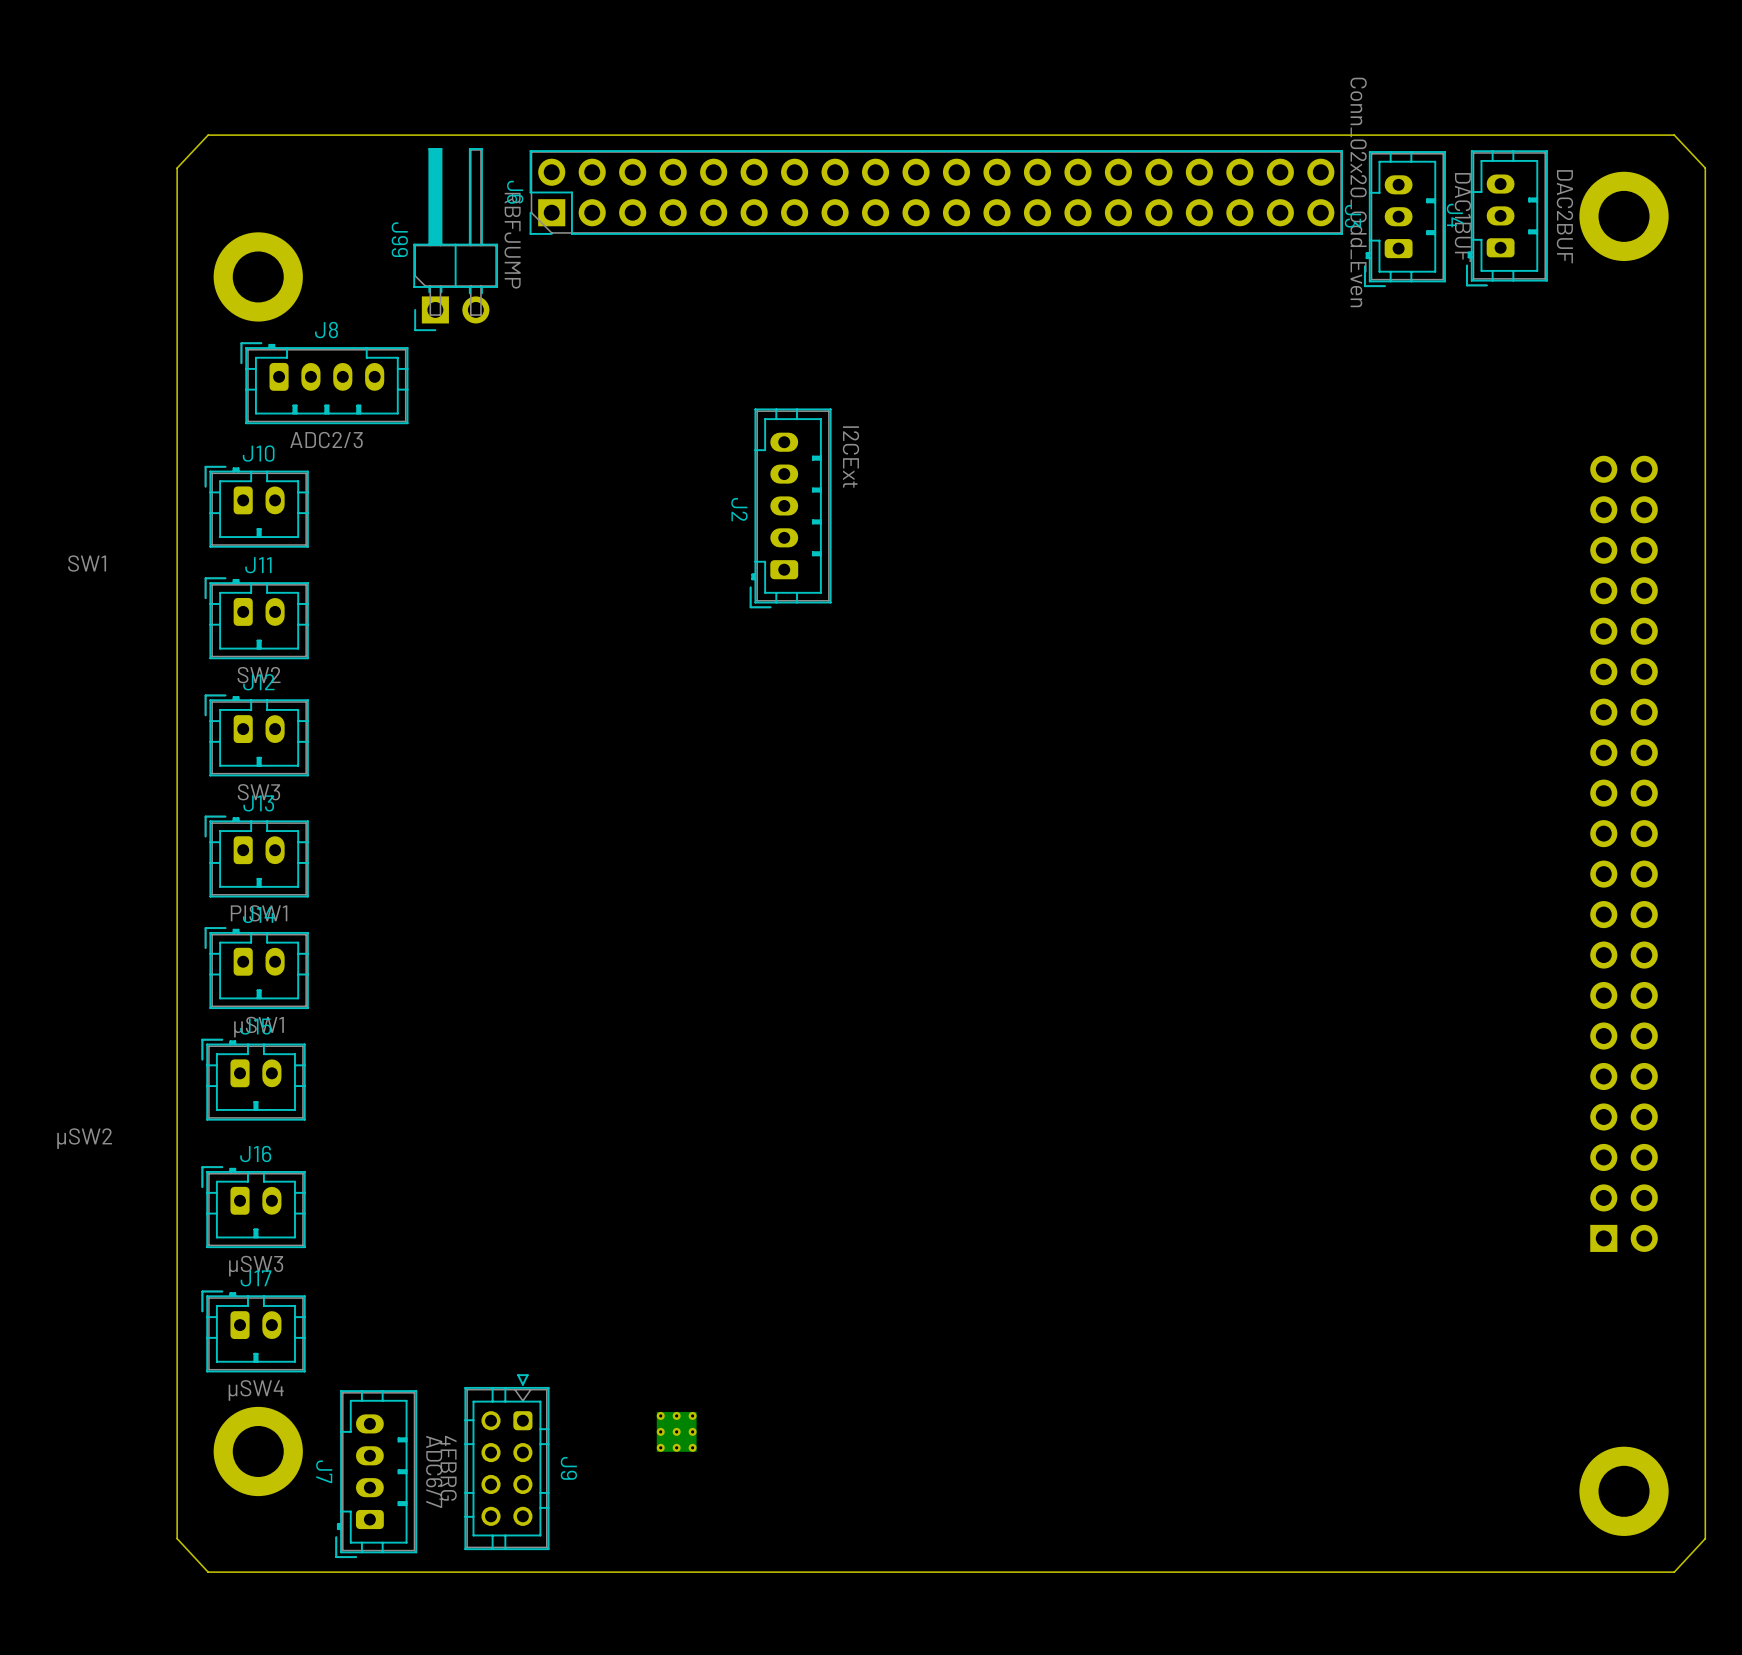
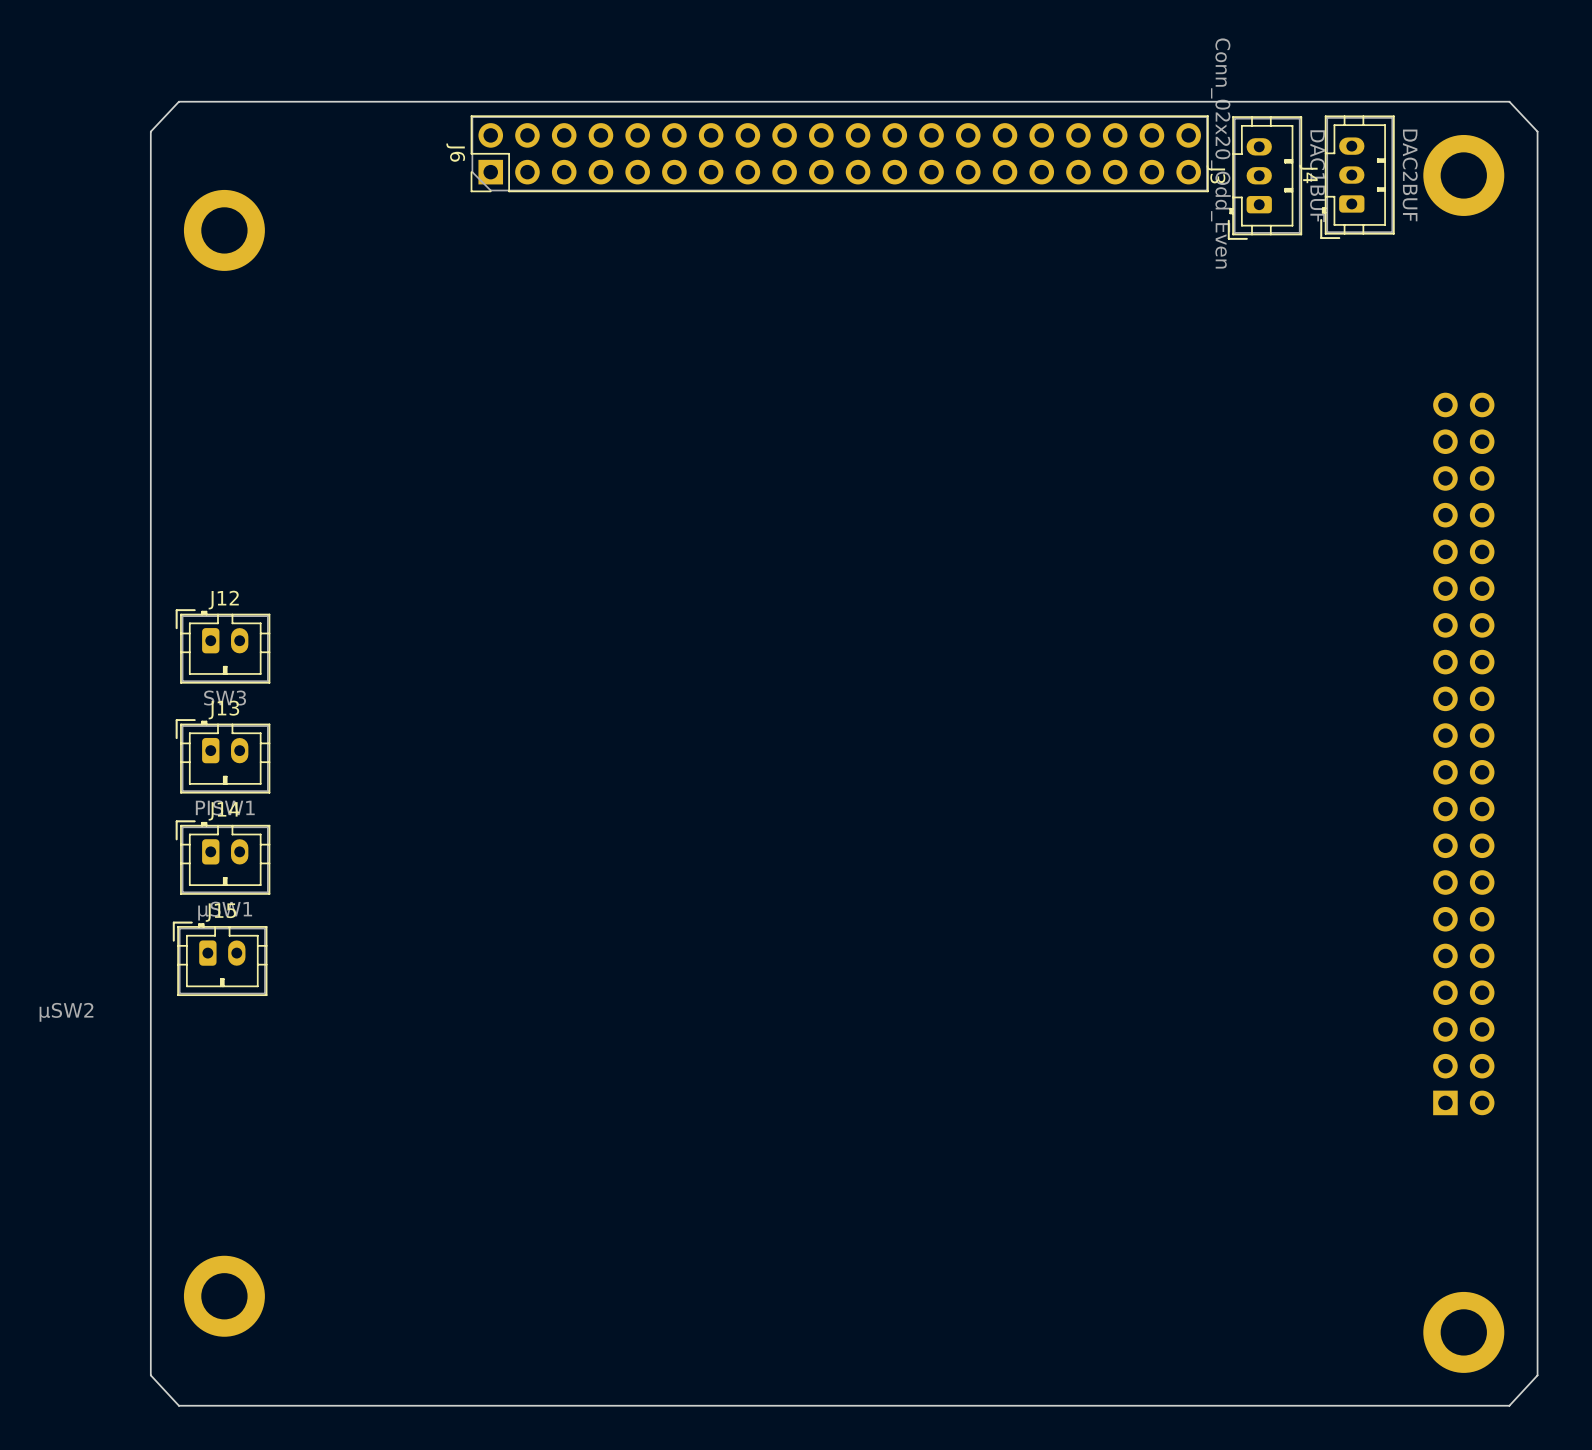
J99: RBFJUMP (455, 239) -> none
J8: ADC2/3 (324, 383) -> none
J10: SW1 (256, 506) -> none
J2: I2CExt (790, 508) -> none
J11: SW2 (256, 618) -> none
J16: μSW3 (253, 1207) -> none
J17: μSW4 (253, 1331) -> none
part: (676, 1431) -> none
J9: 4FBRG (506, 1462) -> none
J7: ADC6/7 (376, 1474) -> none

